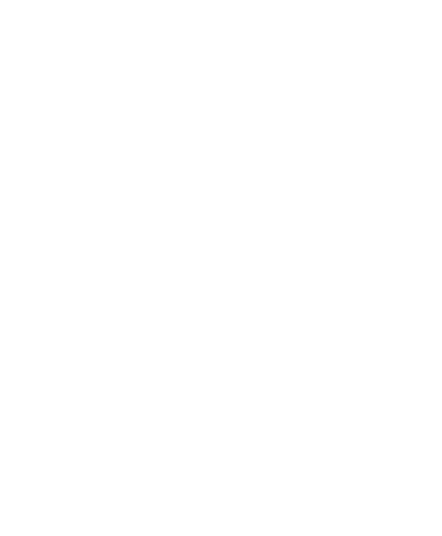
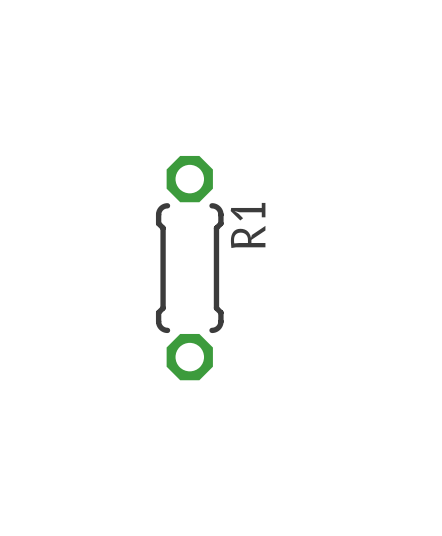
R1: none -> (189, 268)

